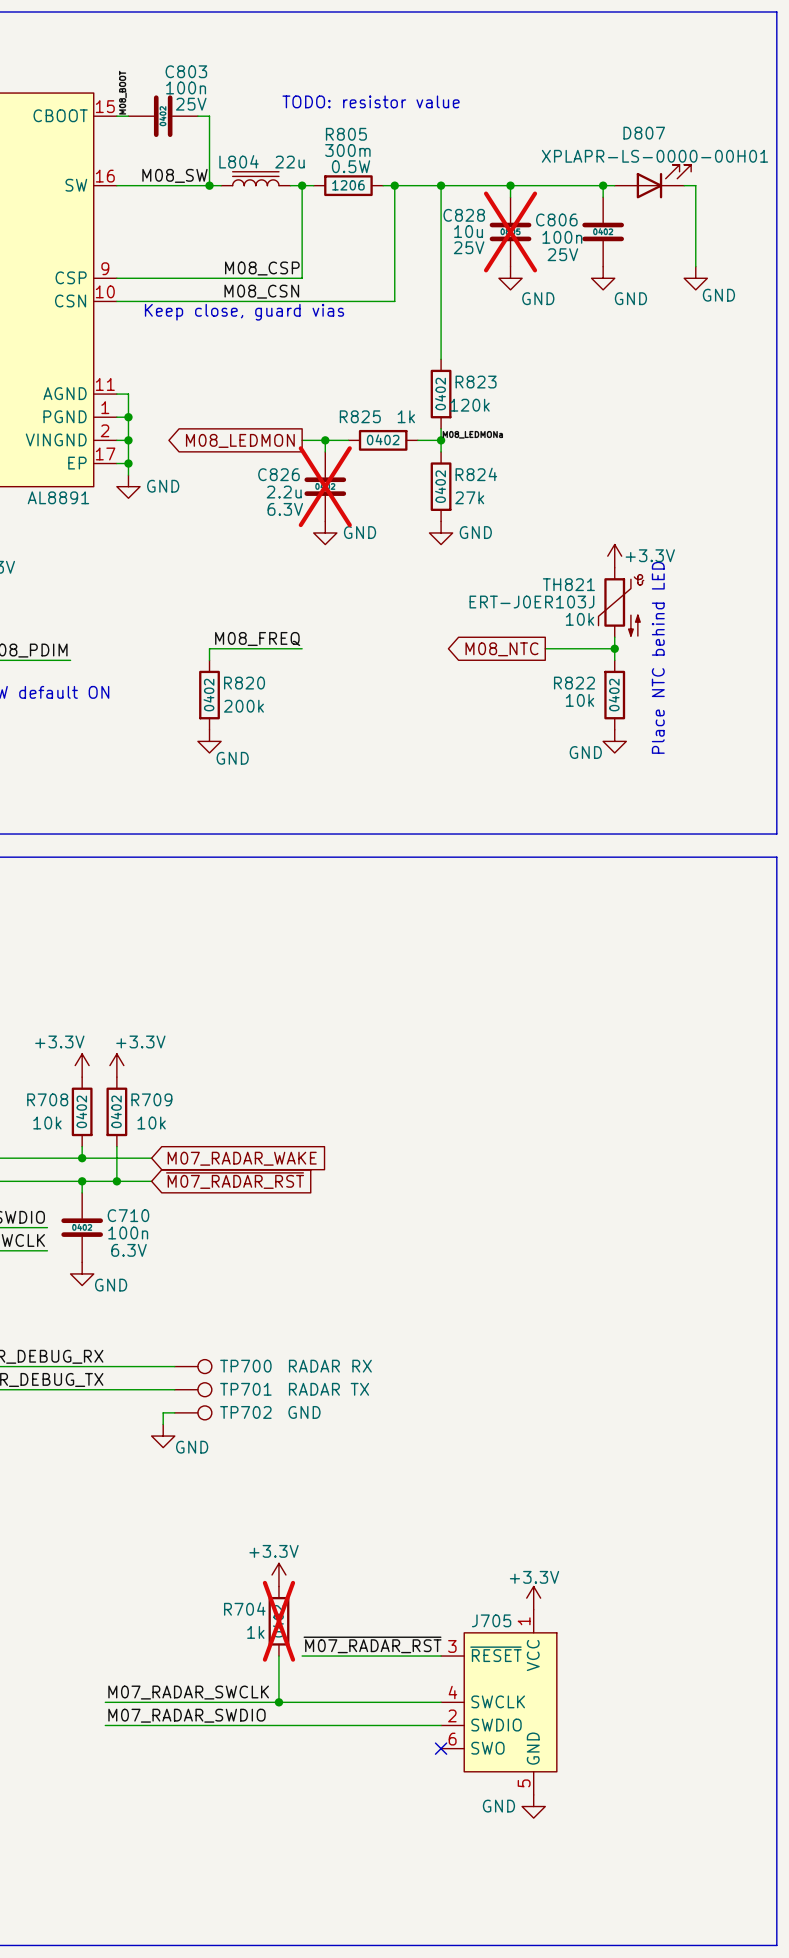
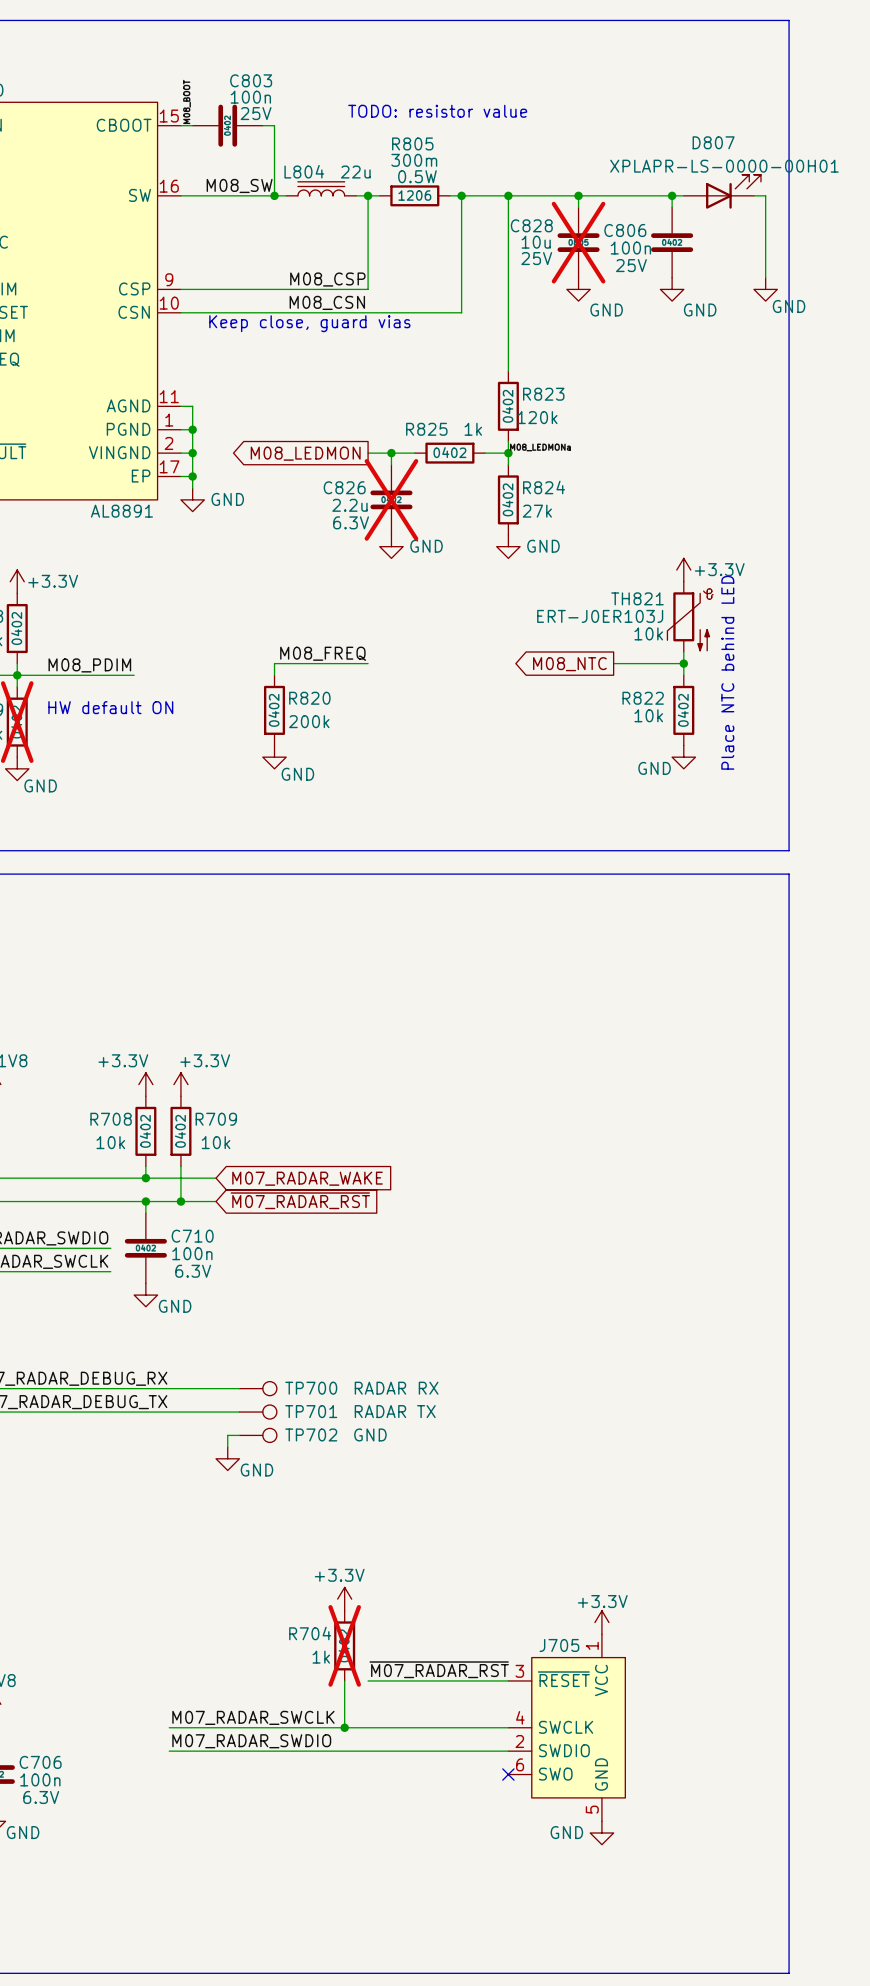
line: (718, 11) (776, 11) (776, 834) (718, 834) -> (789, 20) (789, 850)
line: (718, 857) (776, 857) (776, 1945) (718, 1945) -> (789, 874) (789, 1973)

